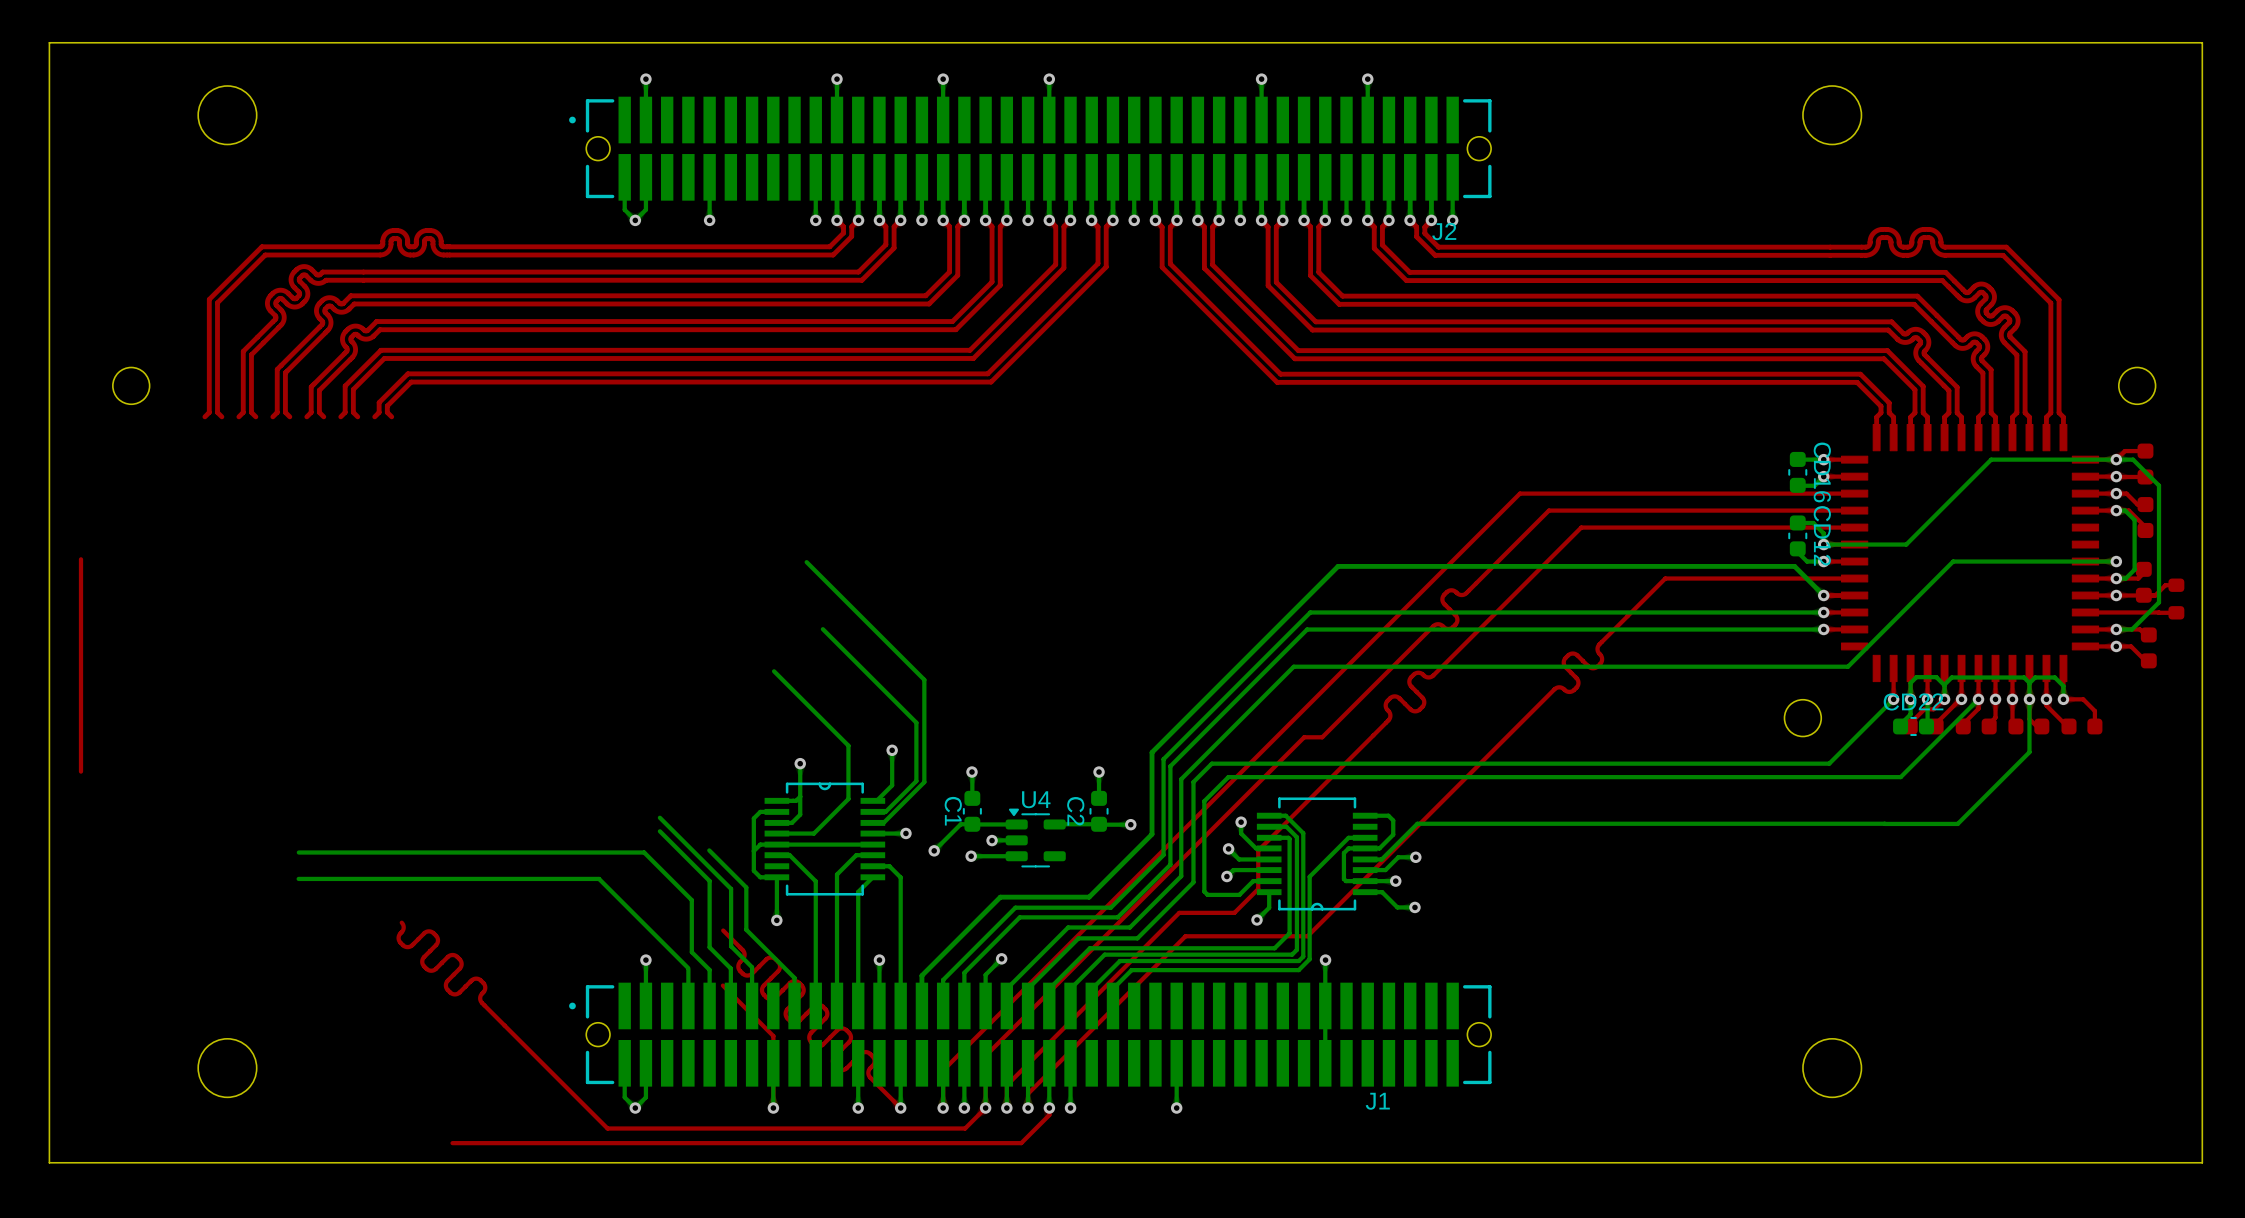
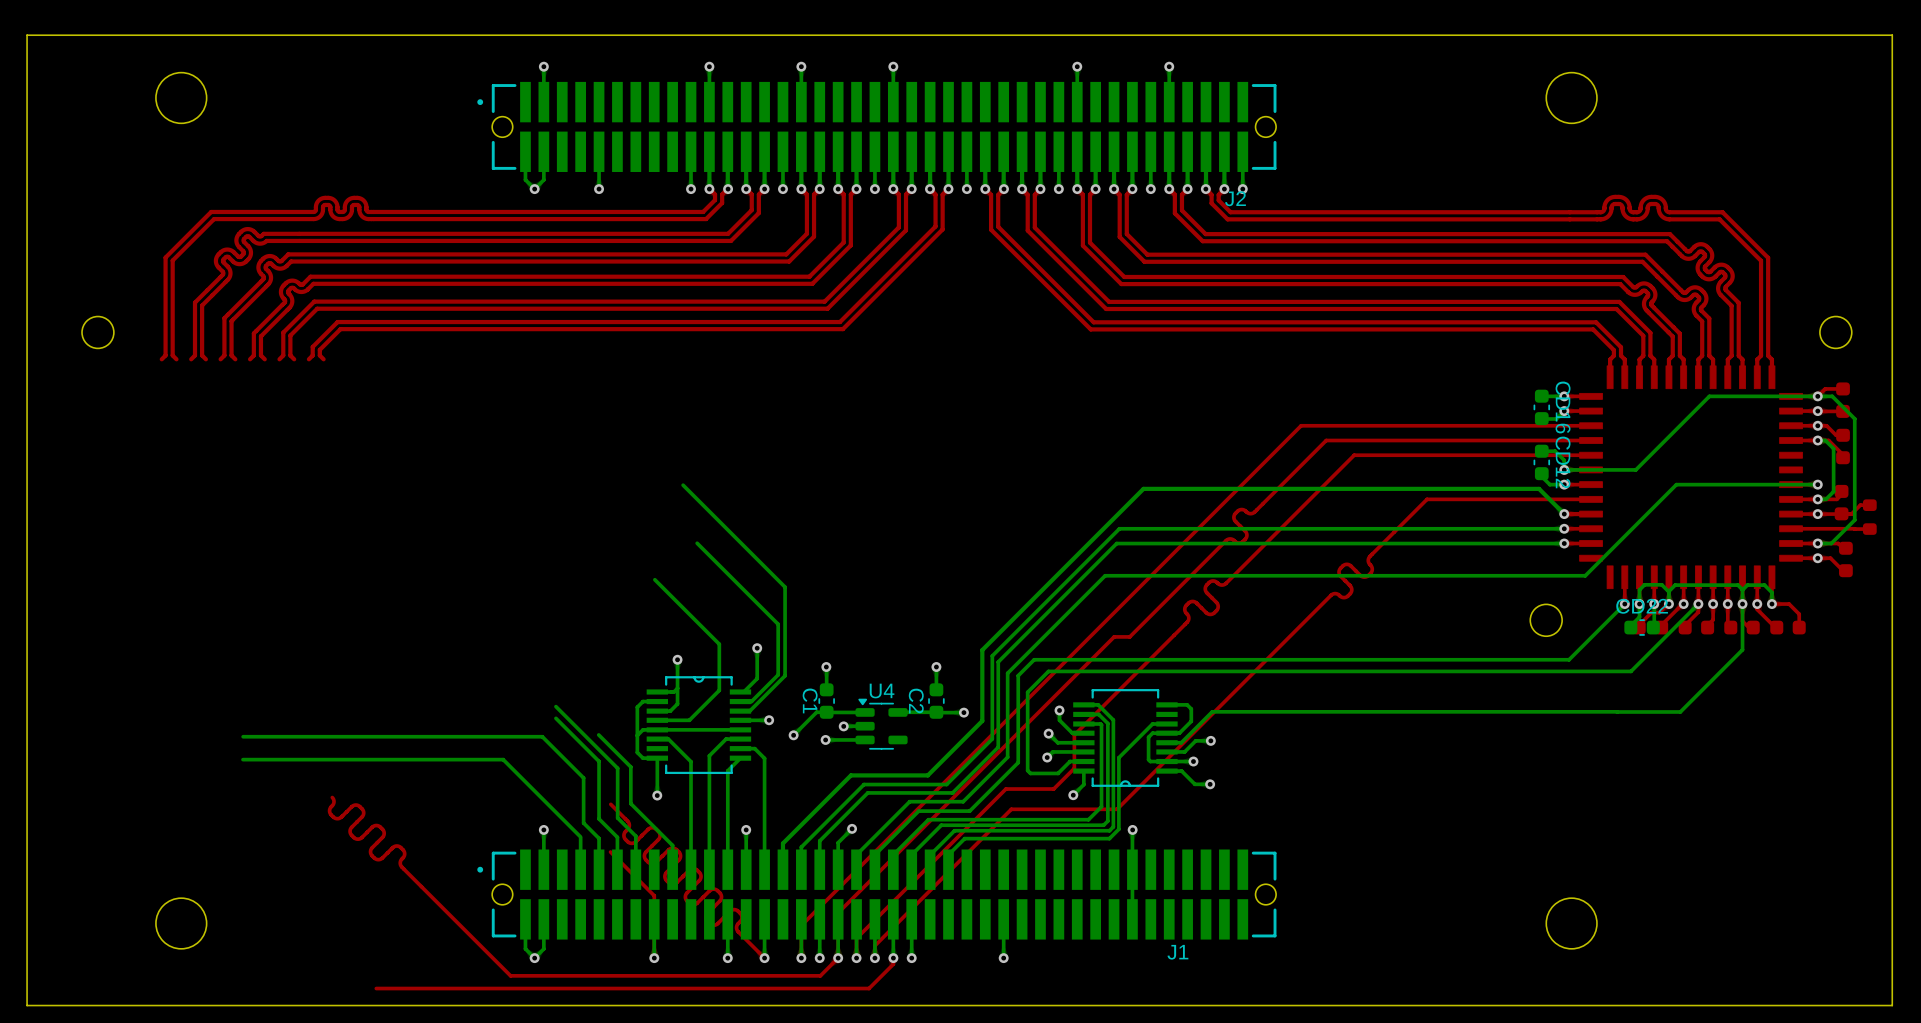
top track: (81, 559) (81, 771) -> none

